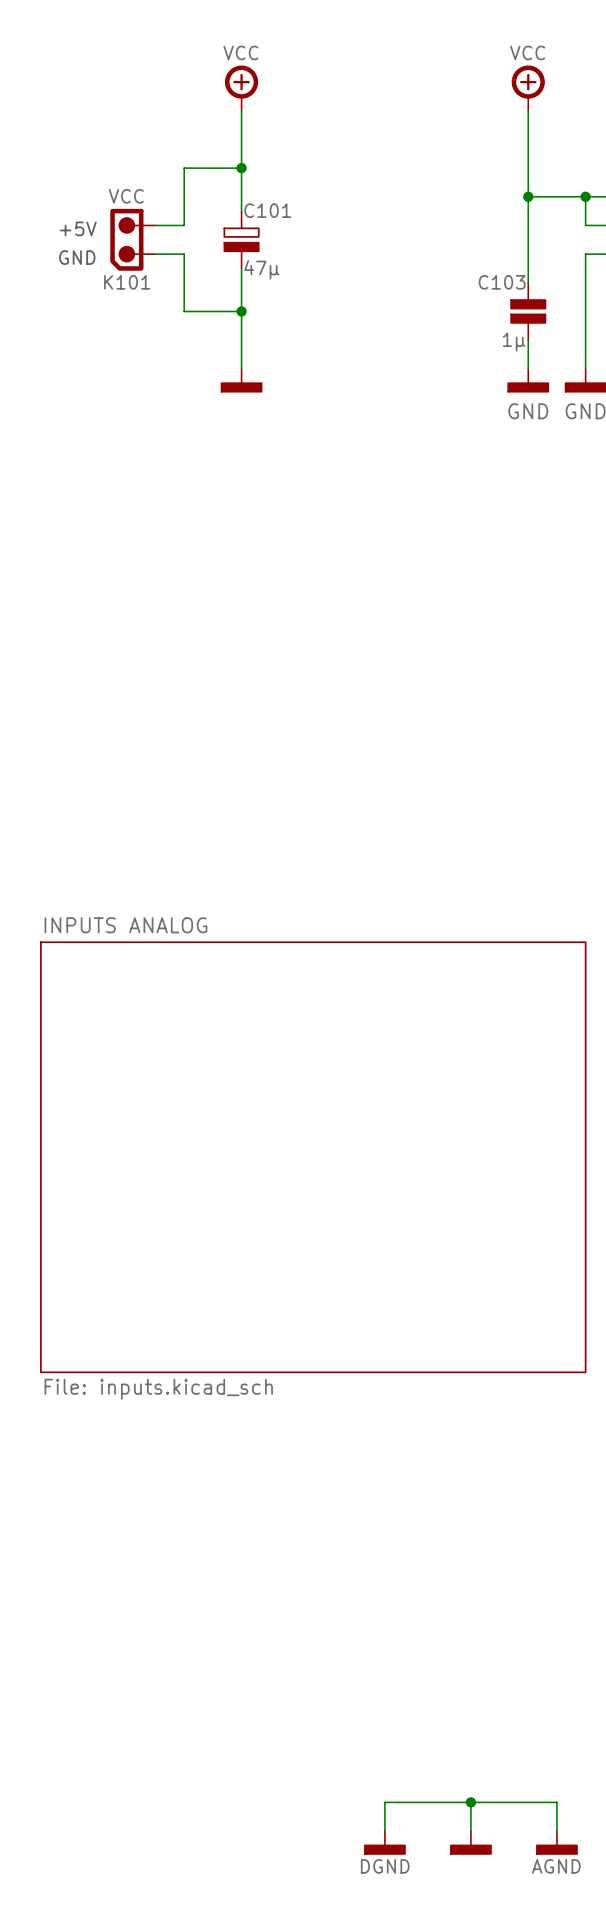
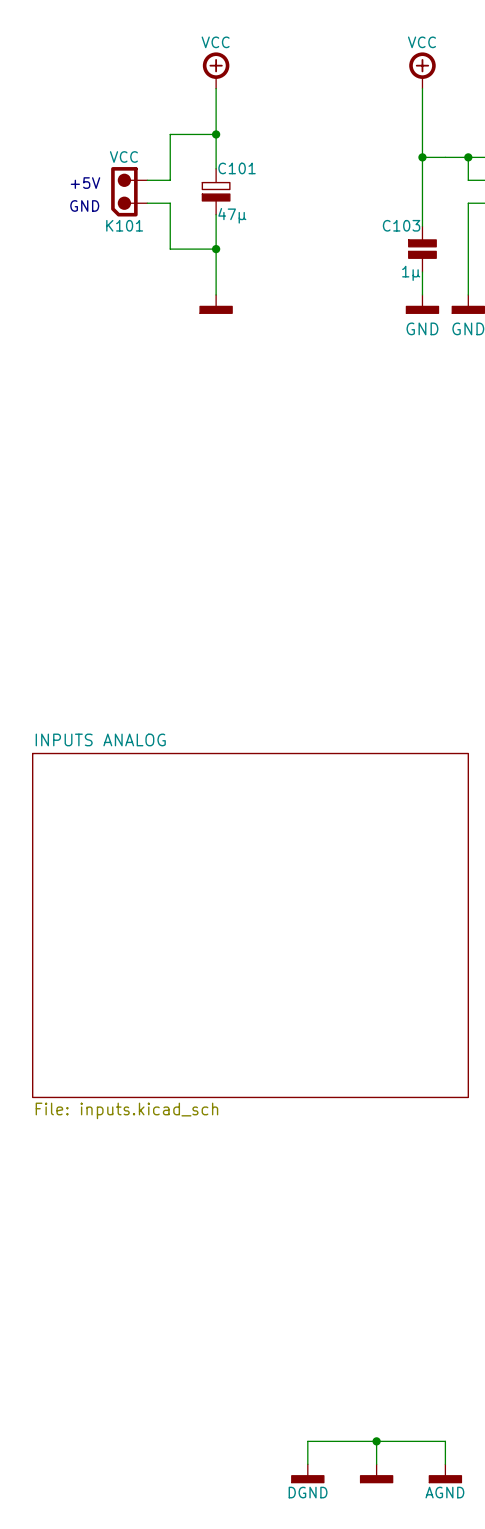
power symbol position: (241, 88) -> (216, 70)
wire: (241, 110) (241, 211) -> (216, 88) (216, 168)
wire: (212, 168) (184, 168) (184, 225) (155, 225) -> (170, 134) (170, 180) (147, 180)
wire: none -> (193, 134) (216, 134)
junction position: (241, 168) -> (216, 134)
text position: +5V (78, 228) -> +5V (85, 183)
K101 position: (132, 239) -> (129, 191)
C101 position: (241, 239) -> (216, 191)
wire: (155, 254) (184, 254) (184, 311) (212, 311) -> (147, 203) (170, 203) (170, 249)
text position: GND (77, 257) -> GND (84, 205)
wire: (241, 268) (241, 368) -> (216, 214) (216, 294)
wire: none -> (193, 249) (216, 249)
junction position: (241, 311) -> (216, 249)
power symbol position: (241, 380) -> (216, 304)

